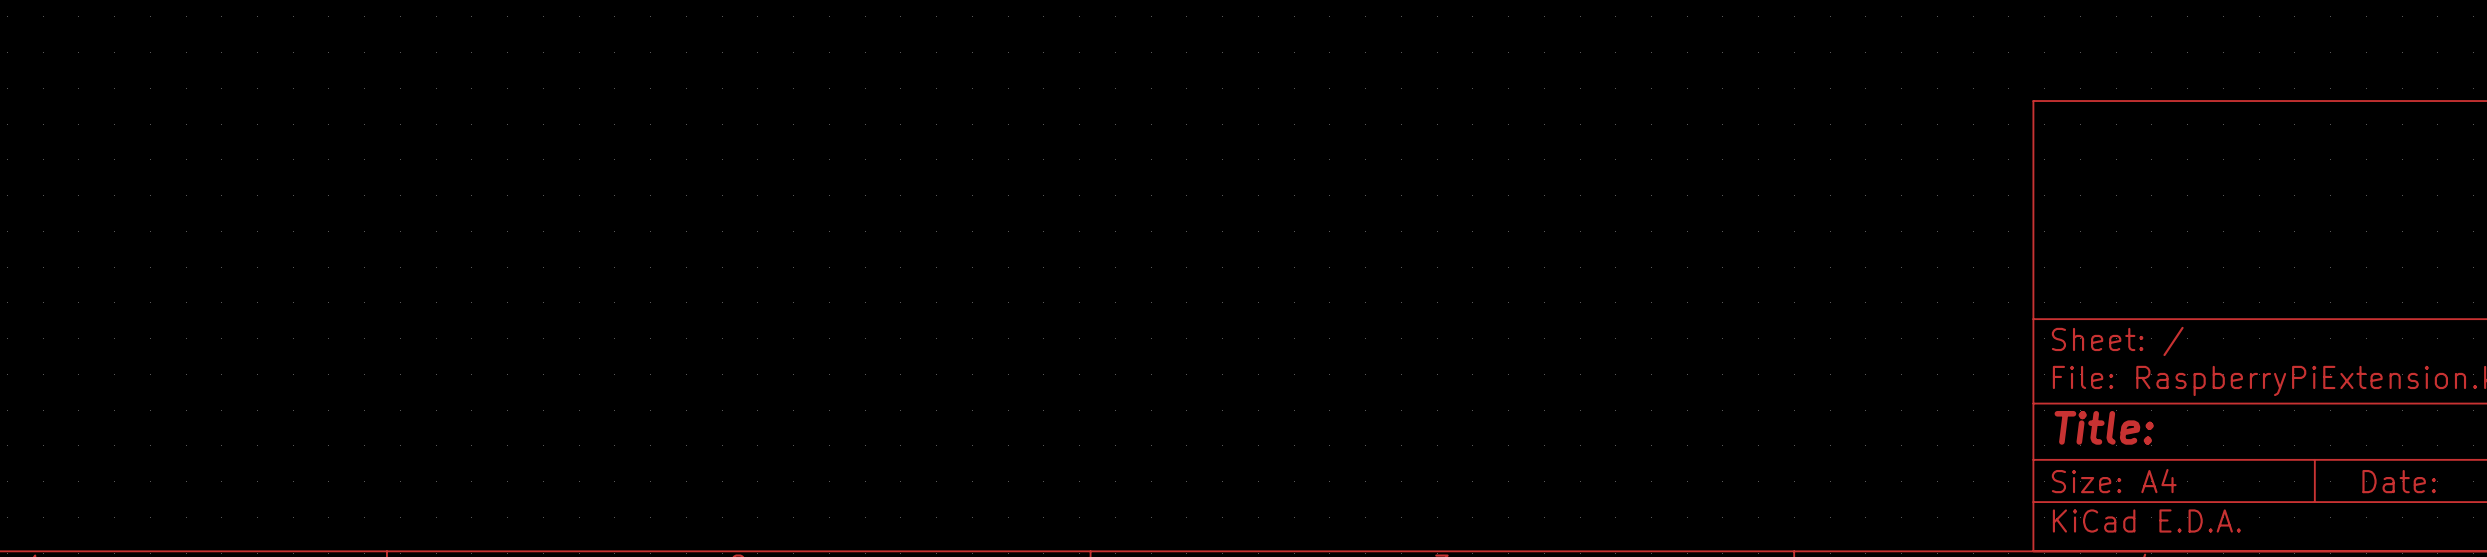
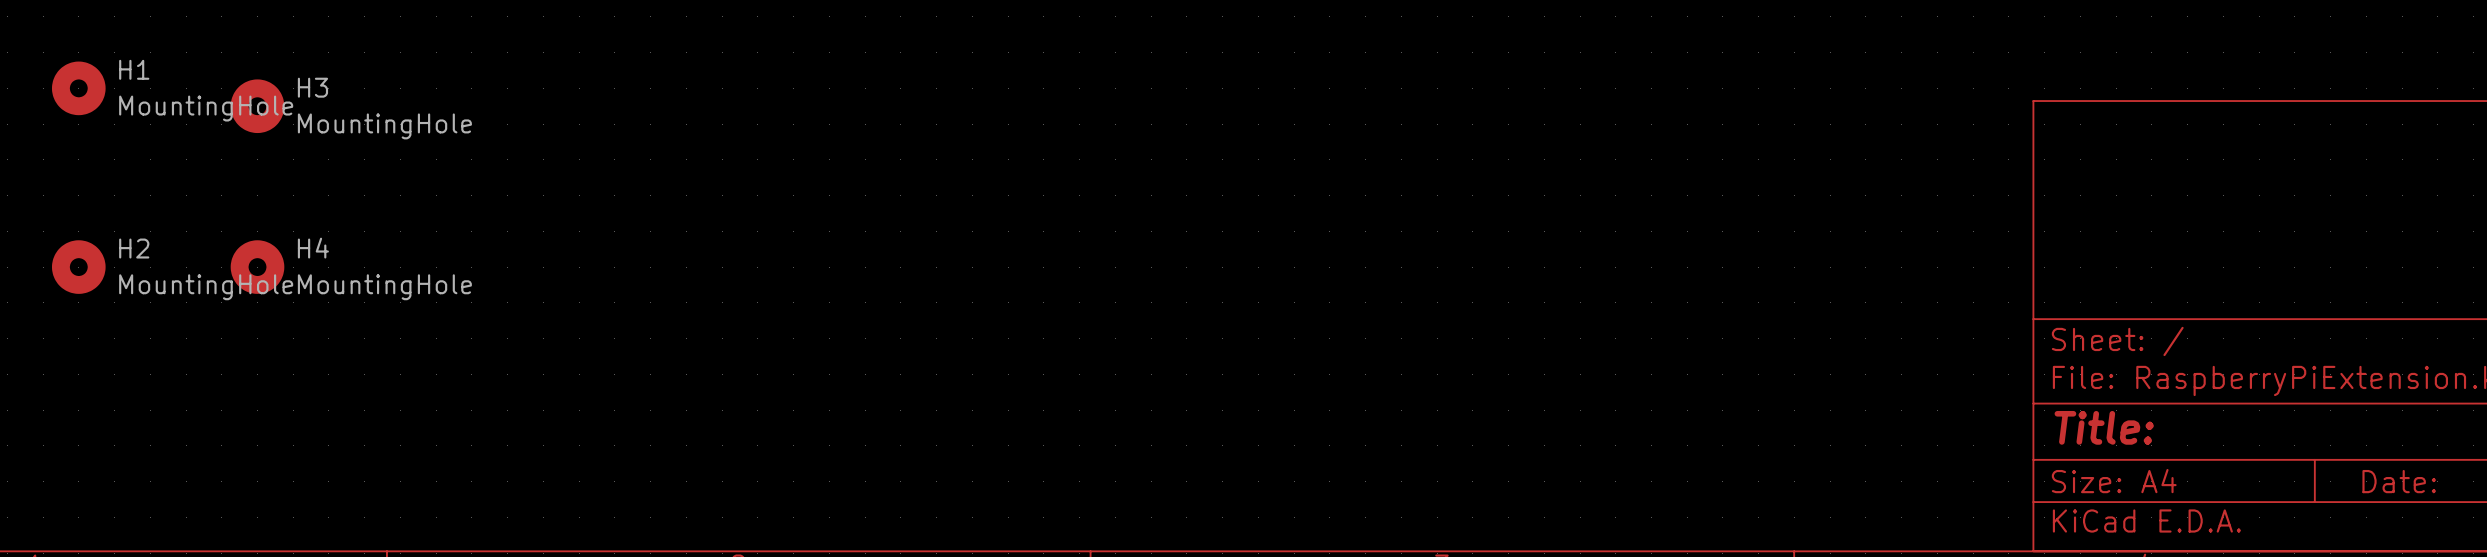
H1: none -> MountingHole (78, 88)
H3: none -> MountingHole (257, 106)
H2: none -> MountingHole (78, 267)
H4: none -> MountingHole (257, 267)

